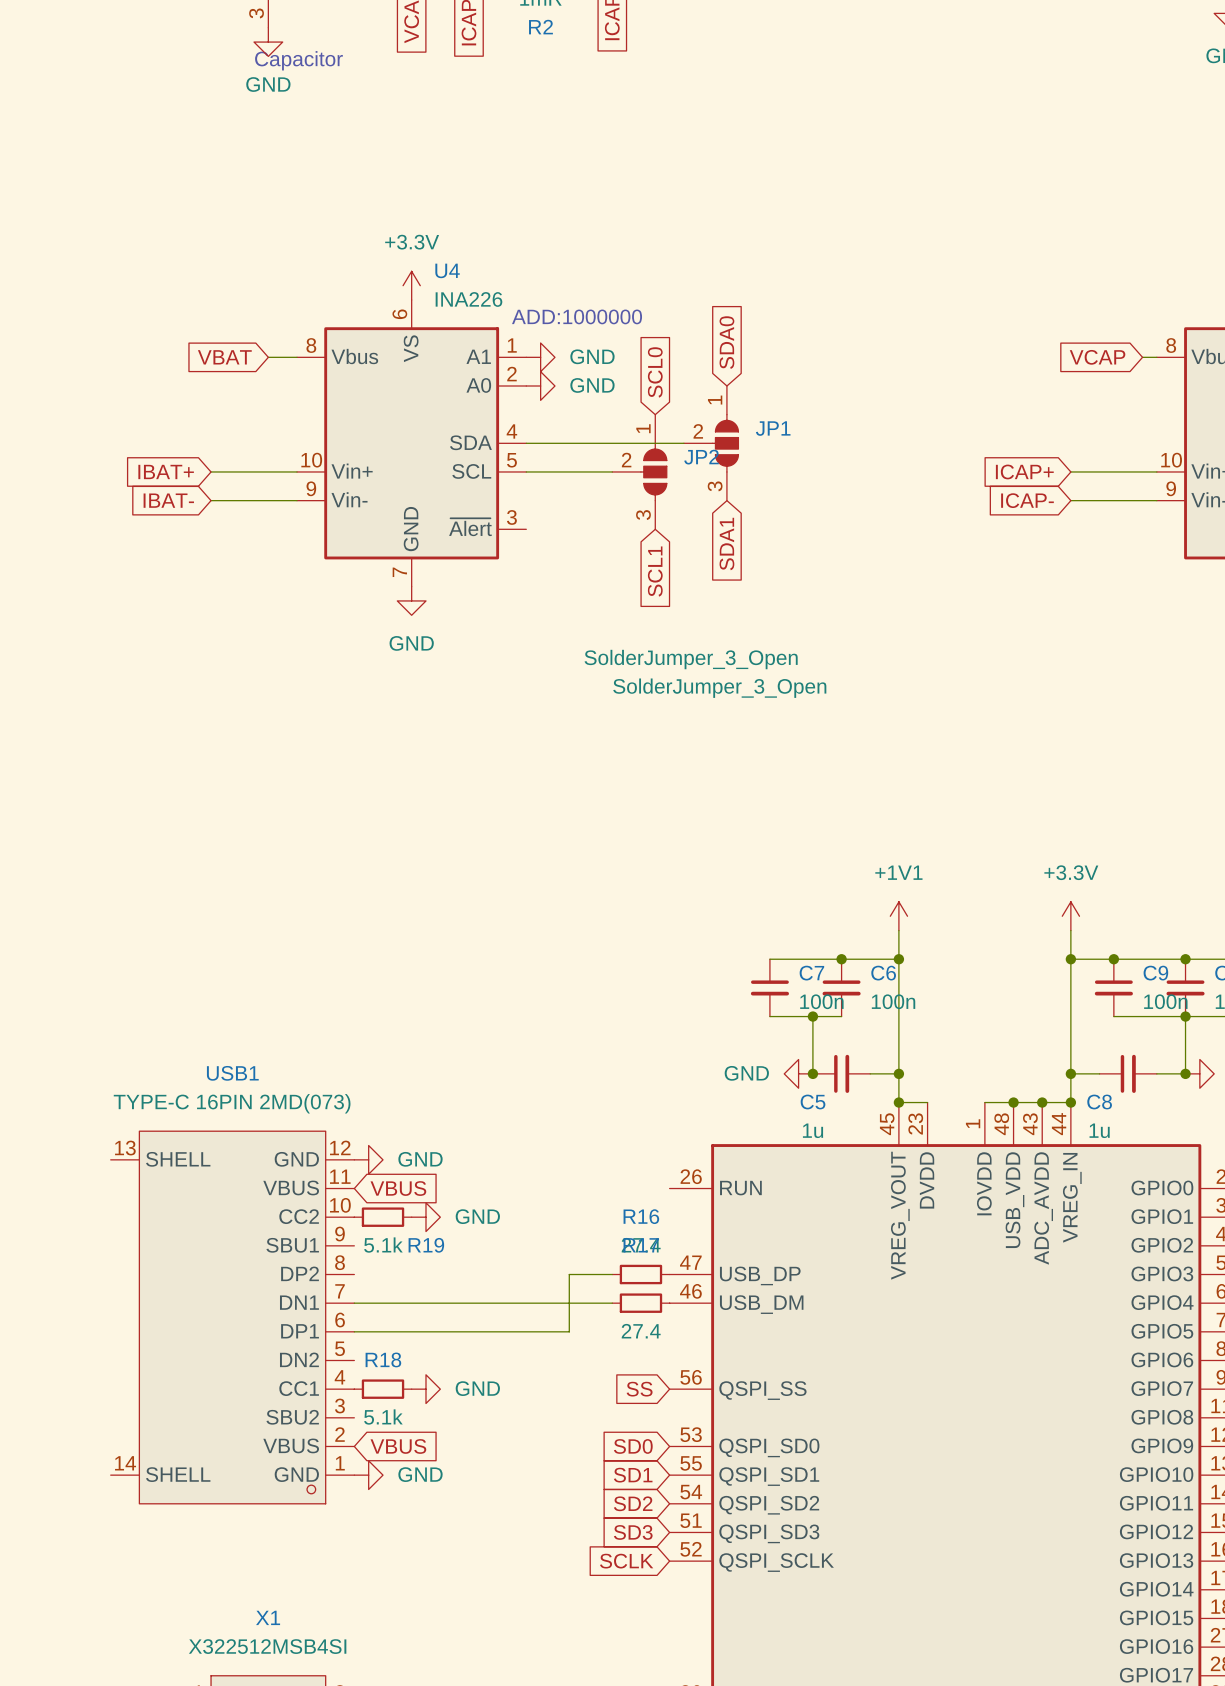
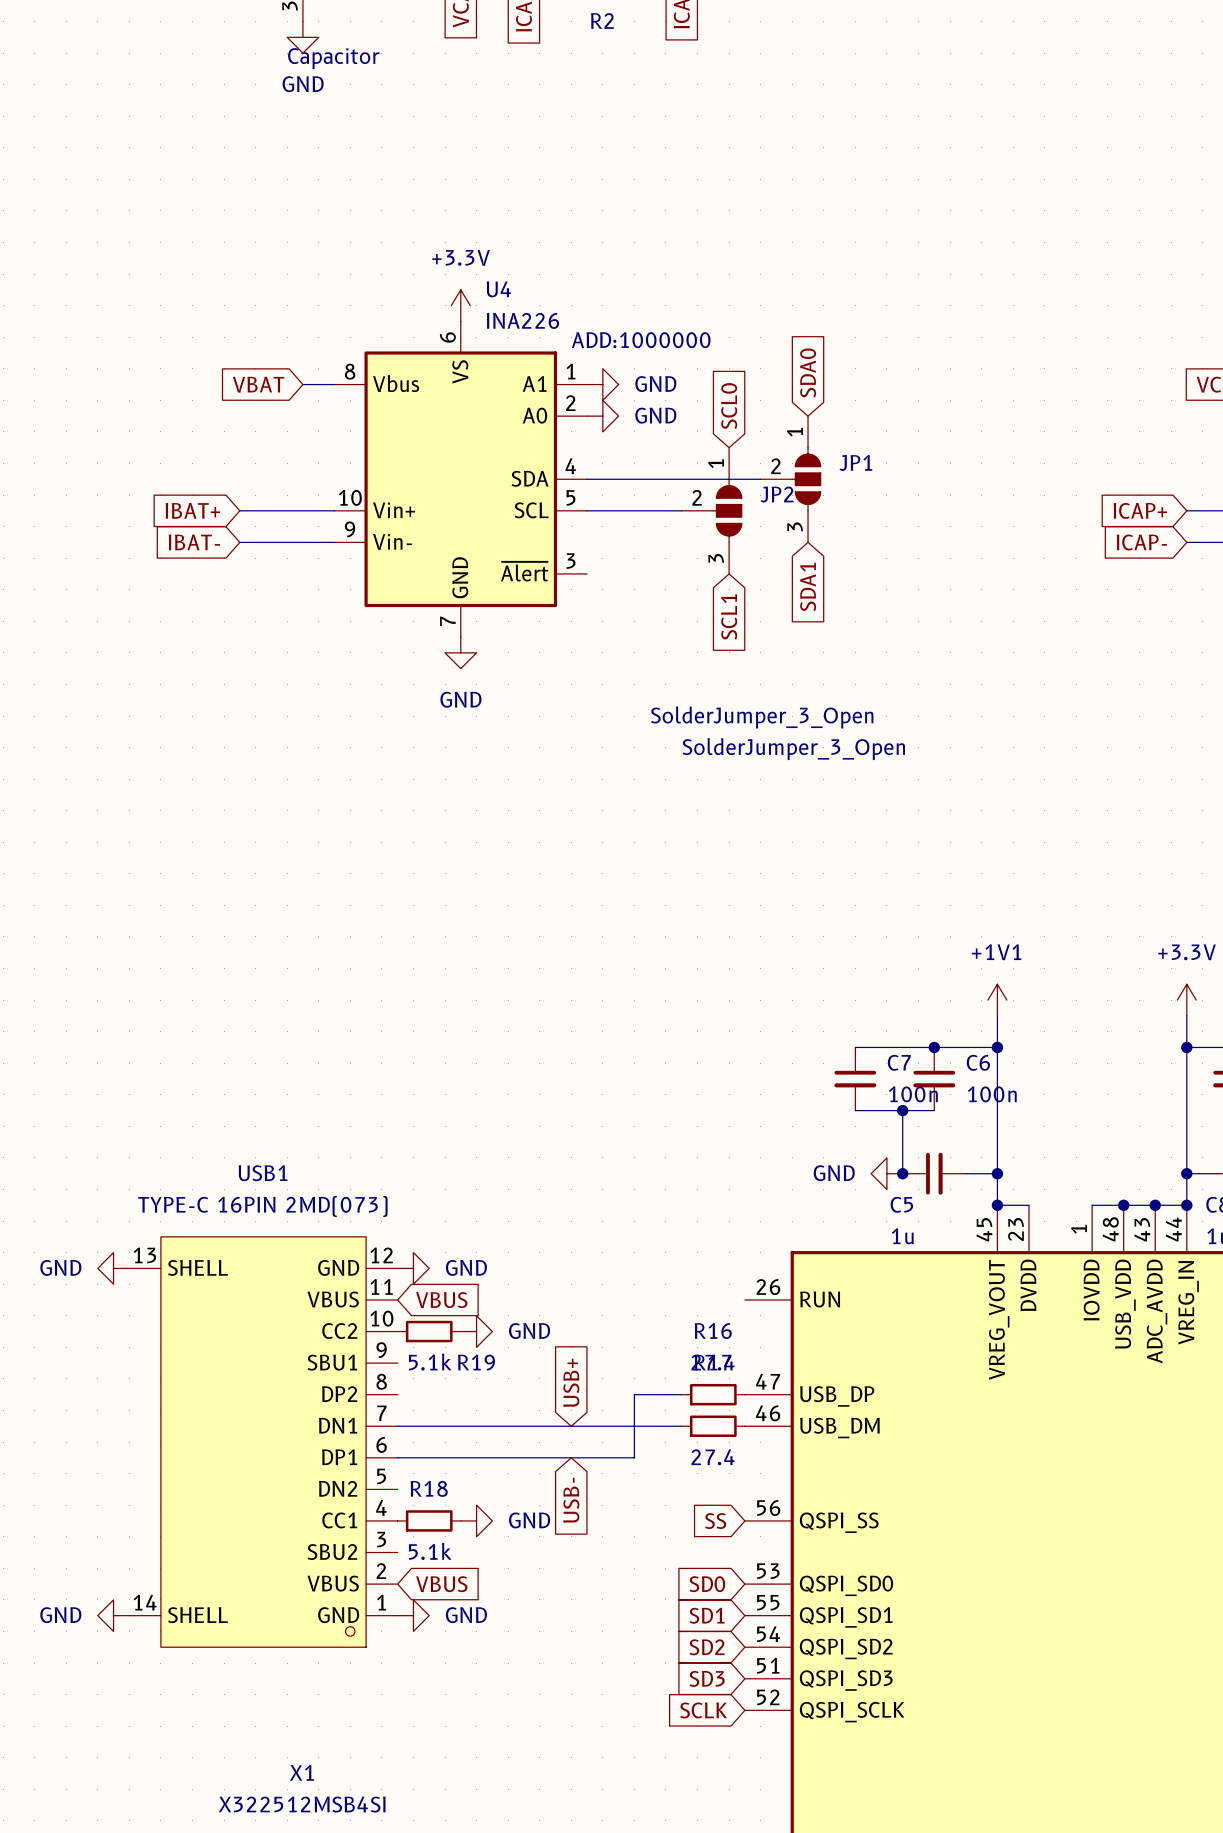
power symbol: none -> GND (113, 1268)
global label: none -> USB+ (571, 1382)
global label: none -> USB- (571, 1500)
power symbol: none -> GND (113, 1615)

